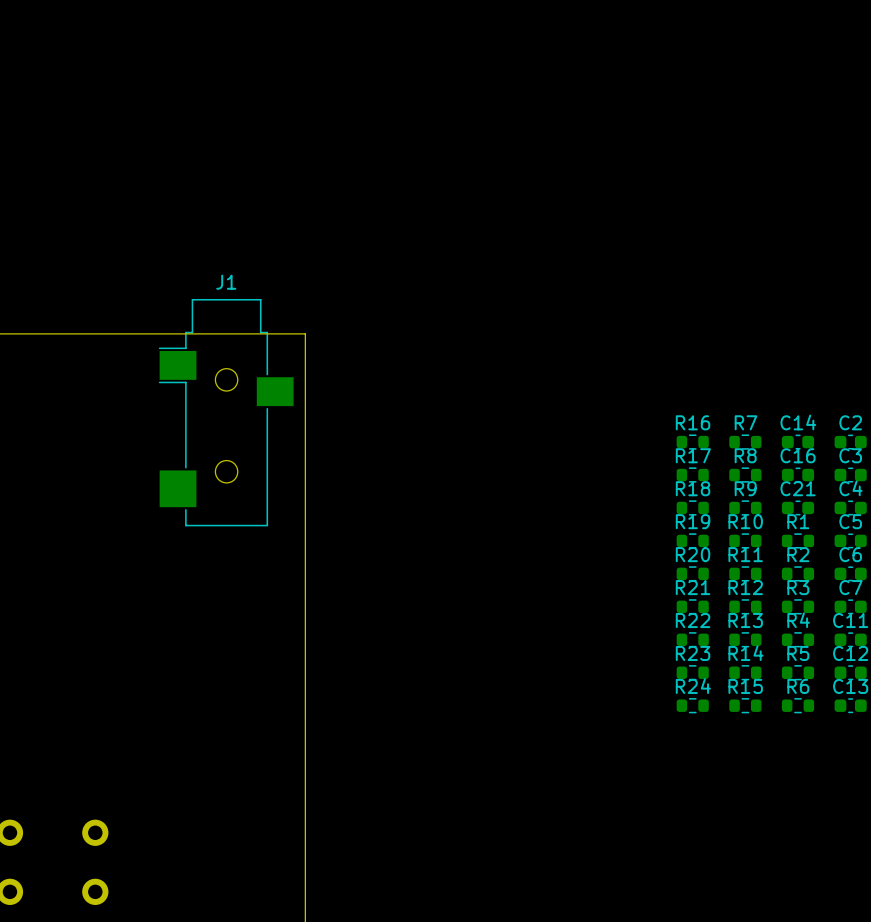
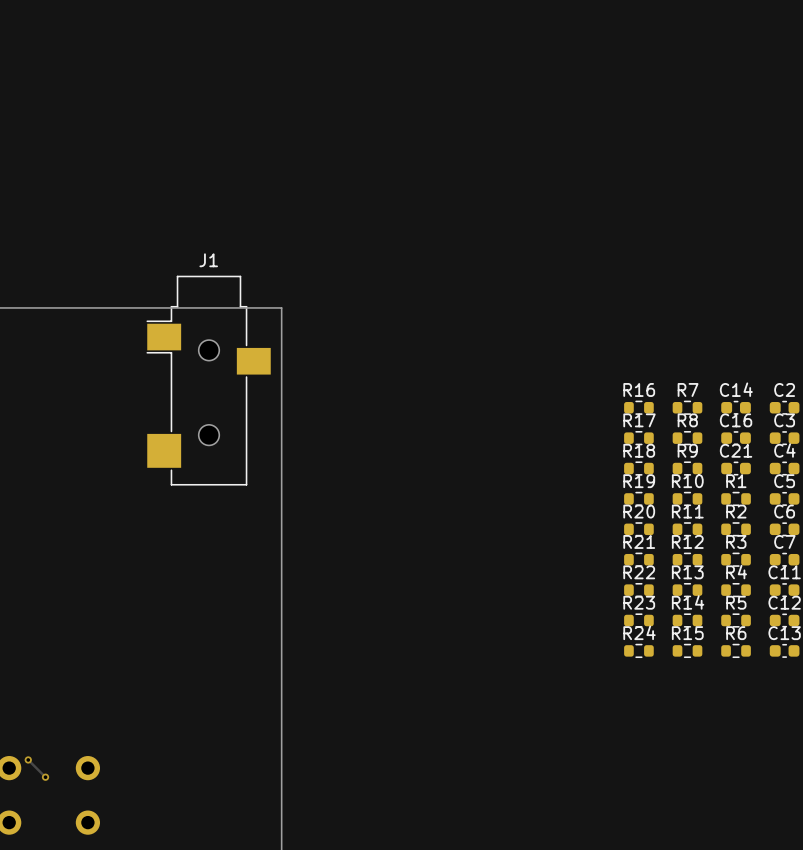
track: none -> (28, 759) (45, 777)
via: none -> (28, 759)
via: none -> (45, 777)

